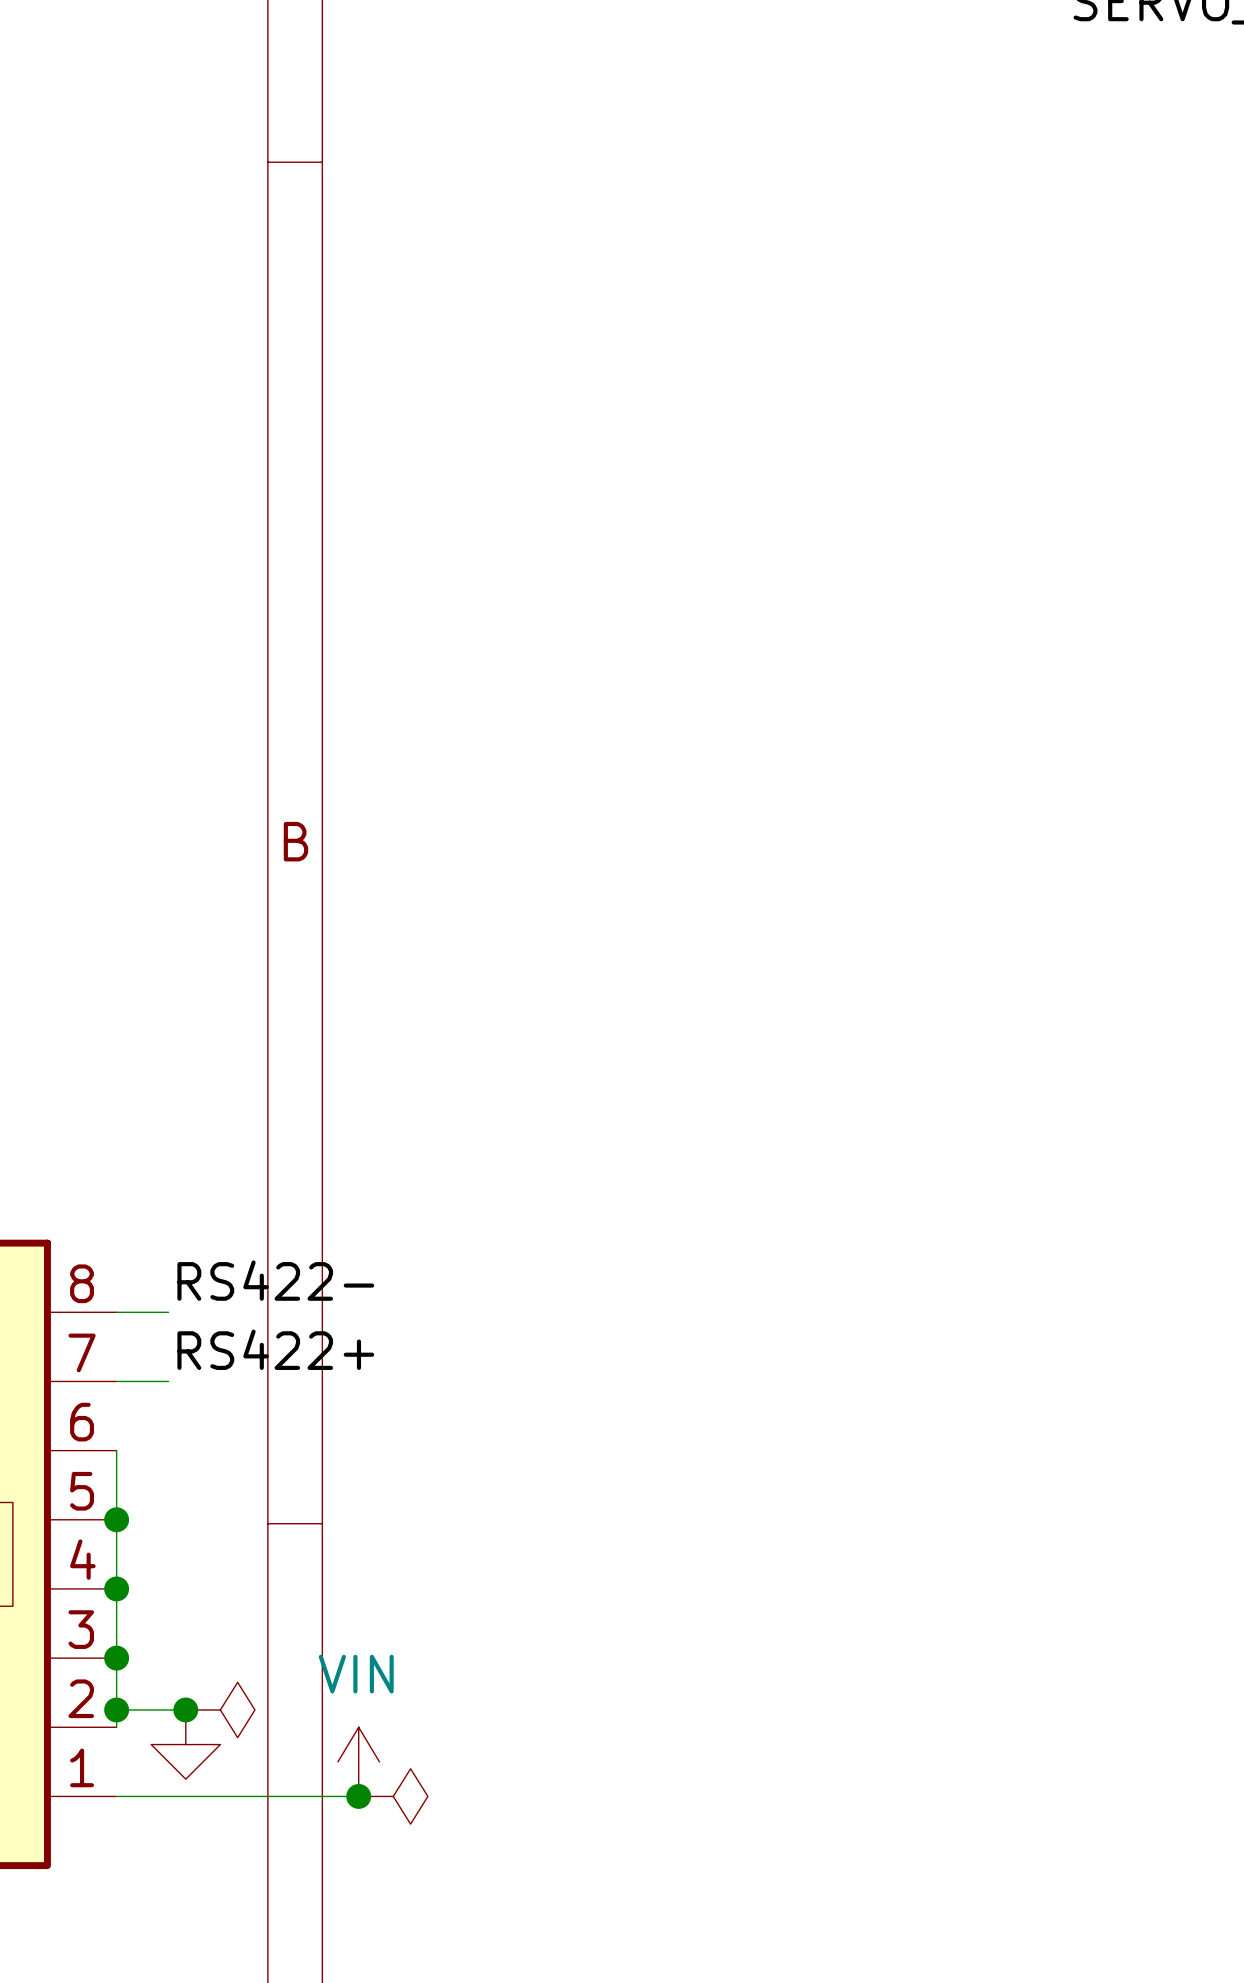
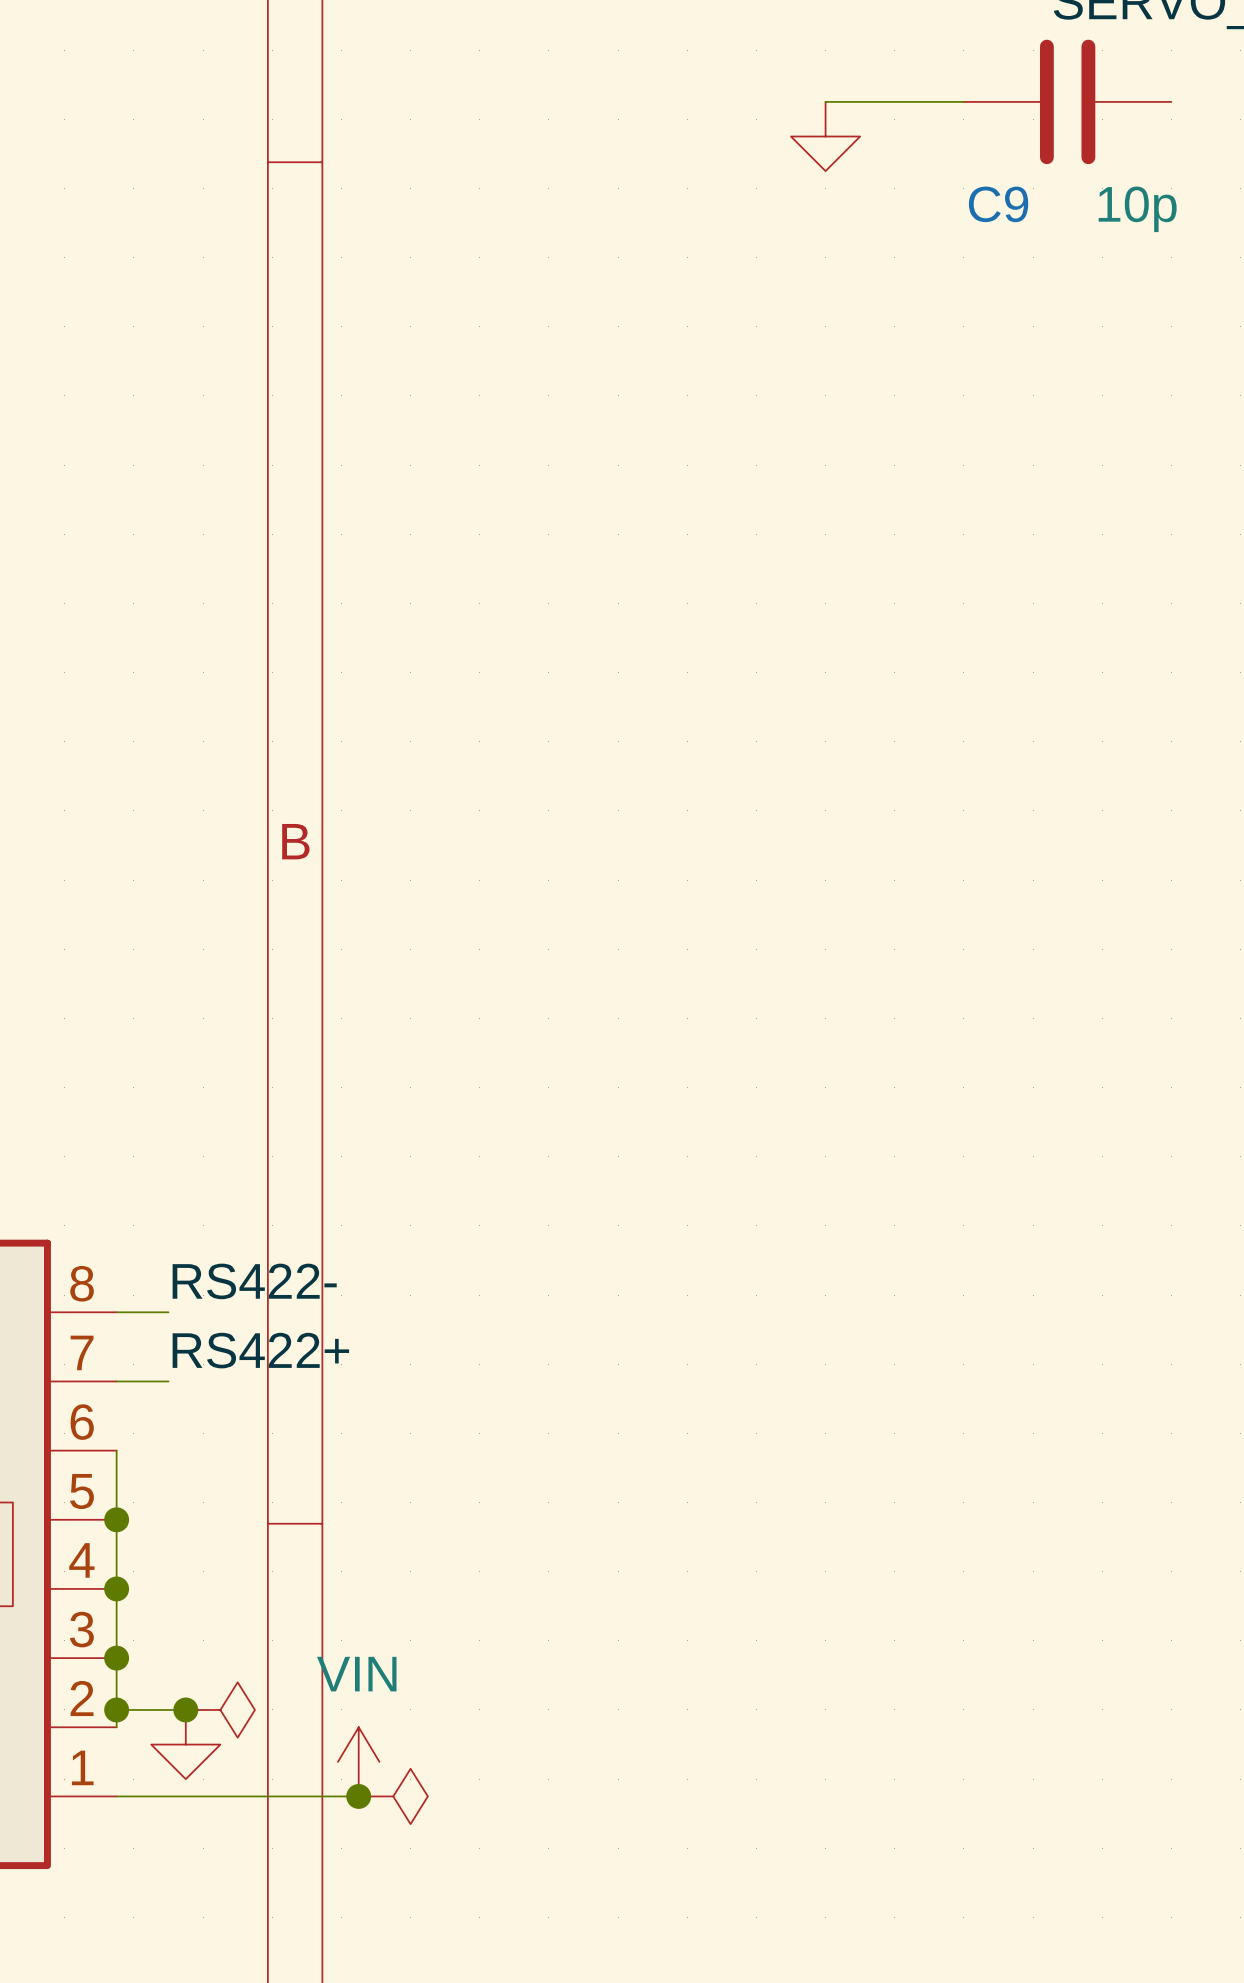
wire: none -> (825, 101) (963, 101)
C9: none -> 10p (1067, 101)
power symbol: none -> (825, 136)

